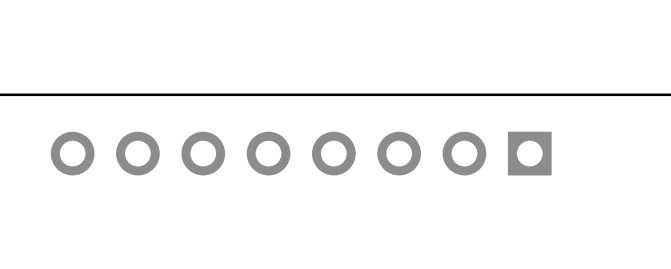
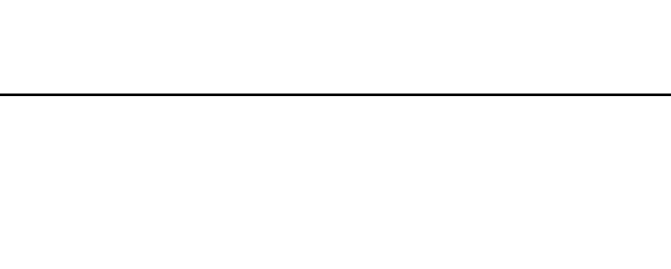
part: (301, 153) -> none

